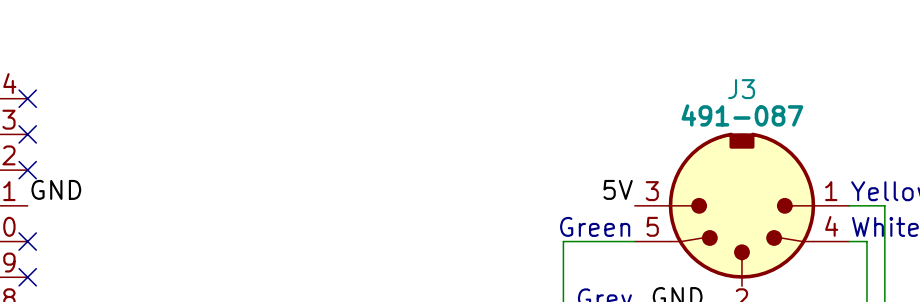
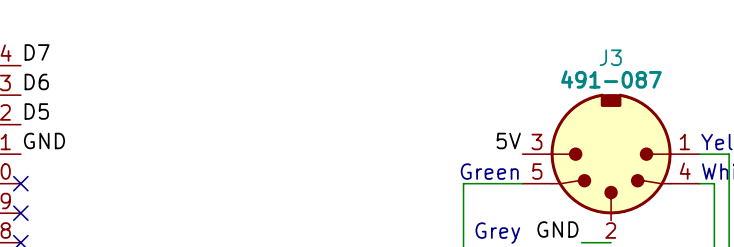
label: none -> D7 (37, 52)
no-connect mark: (27, 98) -> none
label: none -> D6 (36, 81)
no-connect mark: (27, 134) -> none
label: none -> D5 (36, 111)
no-connect mark: (27, 170) -> none

